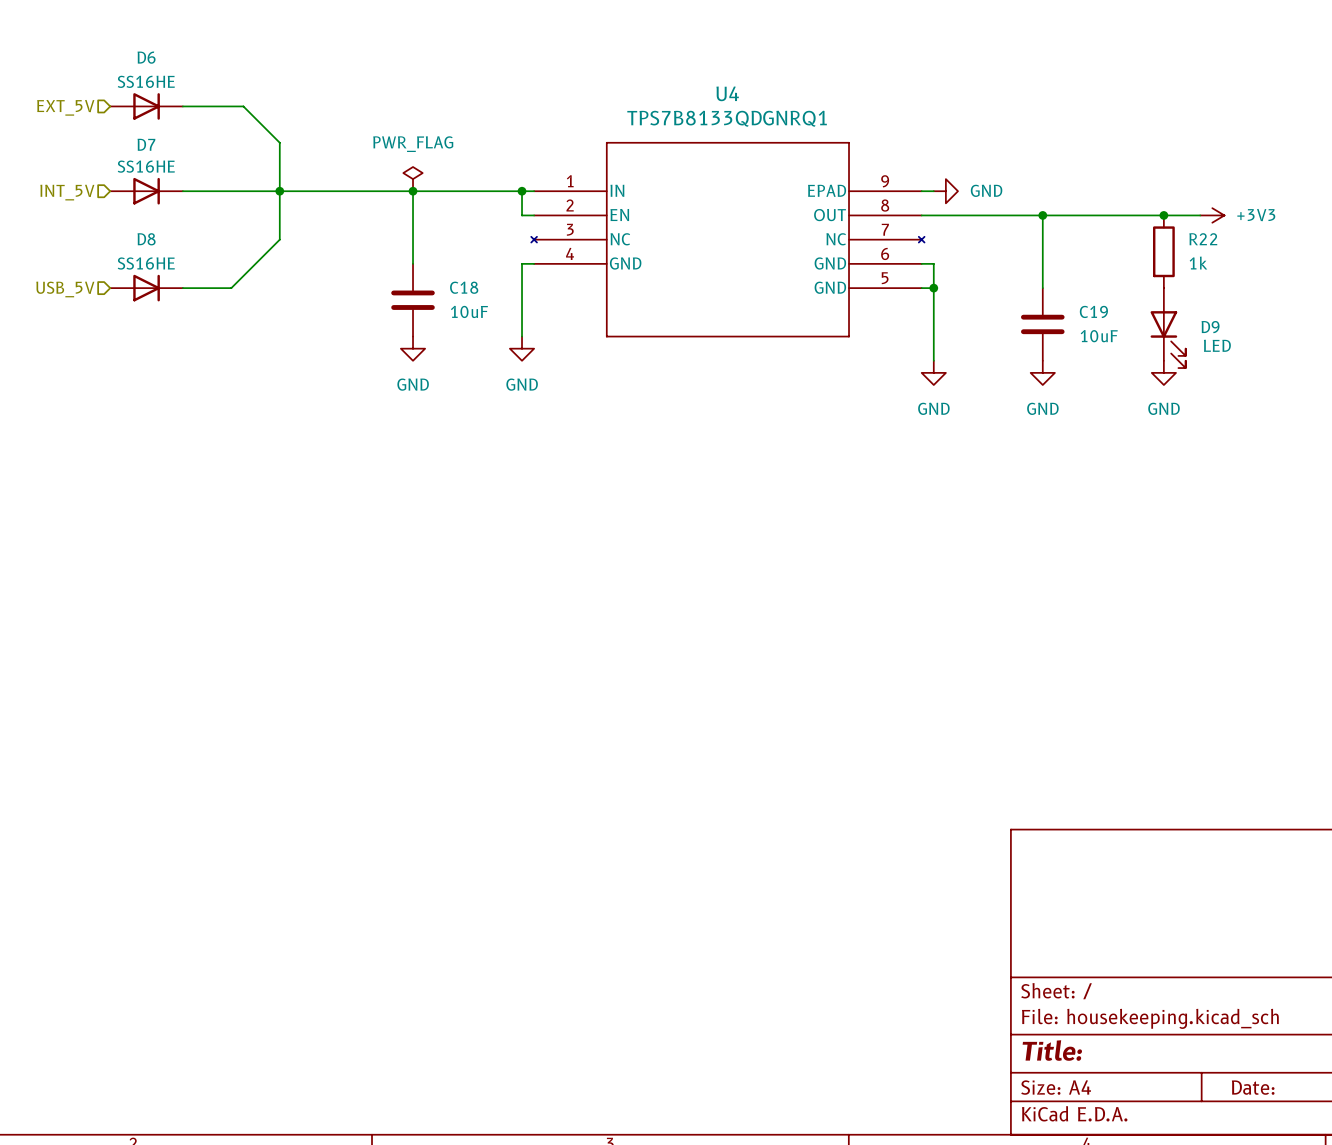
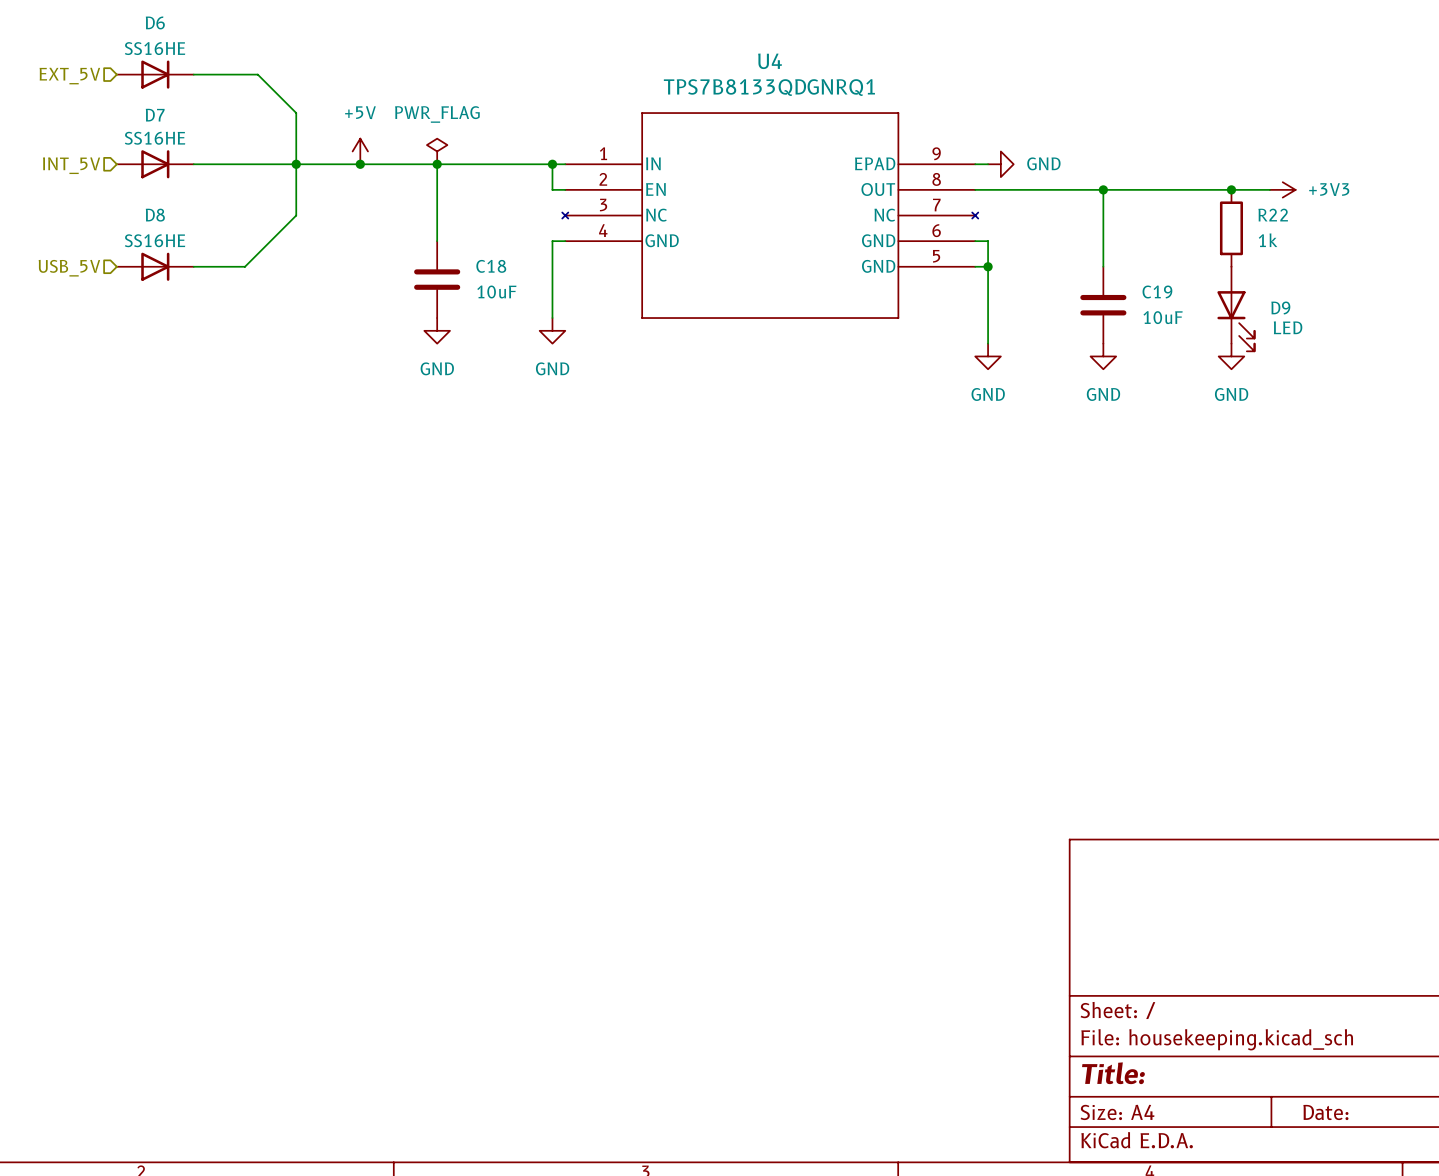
power symbol: none -> +5V (360, 151)
junction: none -> (360, 164)

